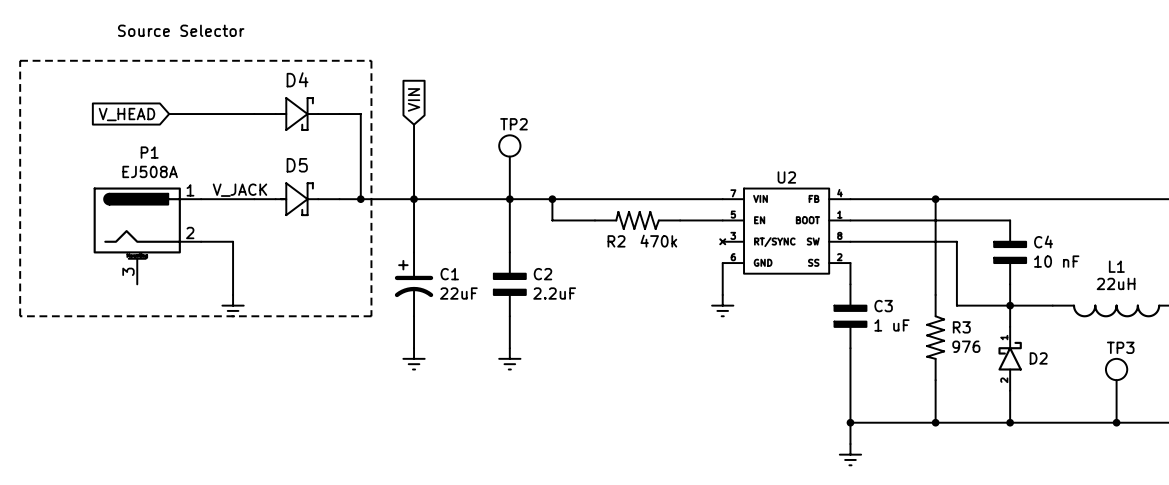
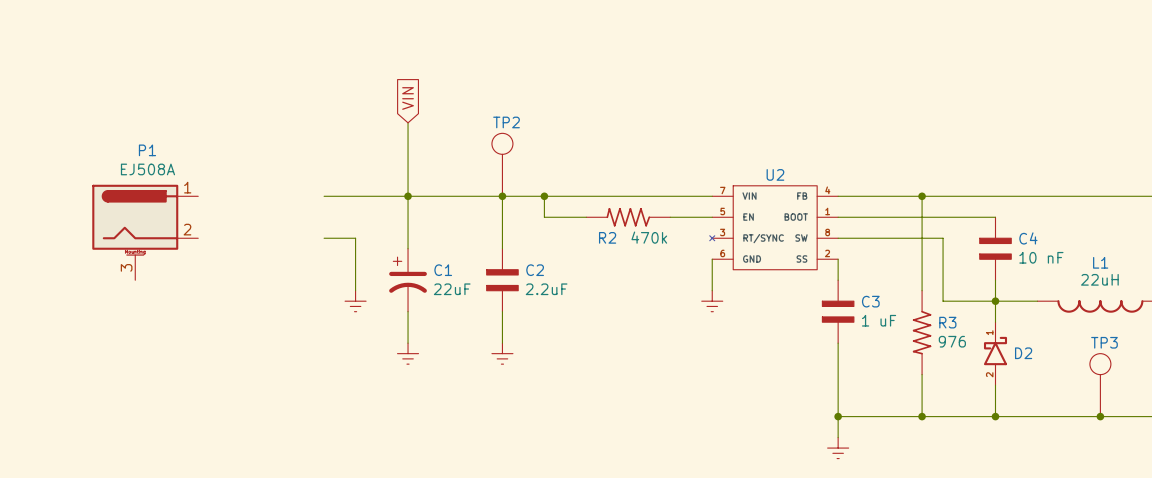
text: Source Selector (181, 30) -> none
line: (20, 60) (20, 316) (371, 316) (371, 60) (20, 60) -> none
global label: V_HEAD (126, 114) -> none
wire: (169, 114) (254, 114) -> none
D4: (296, 114) -> none
wire: (339, 114) (360, 114) (360, 199) -> none
label: V_JACK (239, 190) -> none
wire: (201, 199) (254, 199) -> none
D5: (296, 199) -> none
junction: (360, 199) -> none
wire: (201, 241) (233, 241) (233, 294) -> (324, 238) (355, 238) (355, 290)
power symbol position: (233, 305) -> (355, 301)

